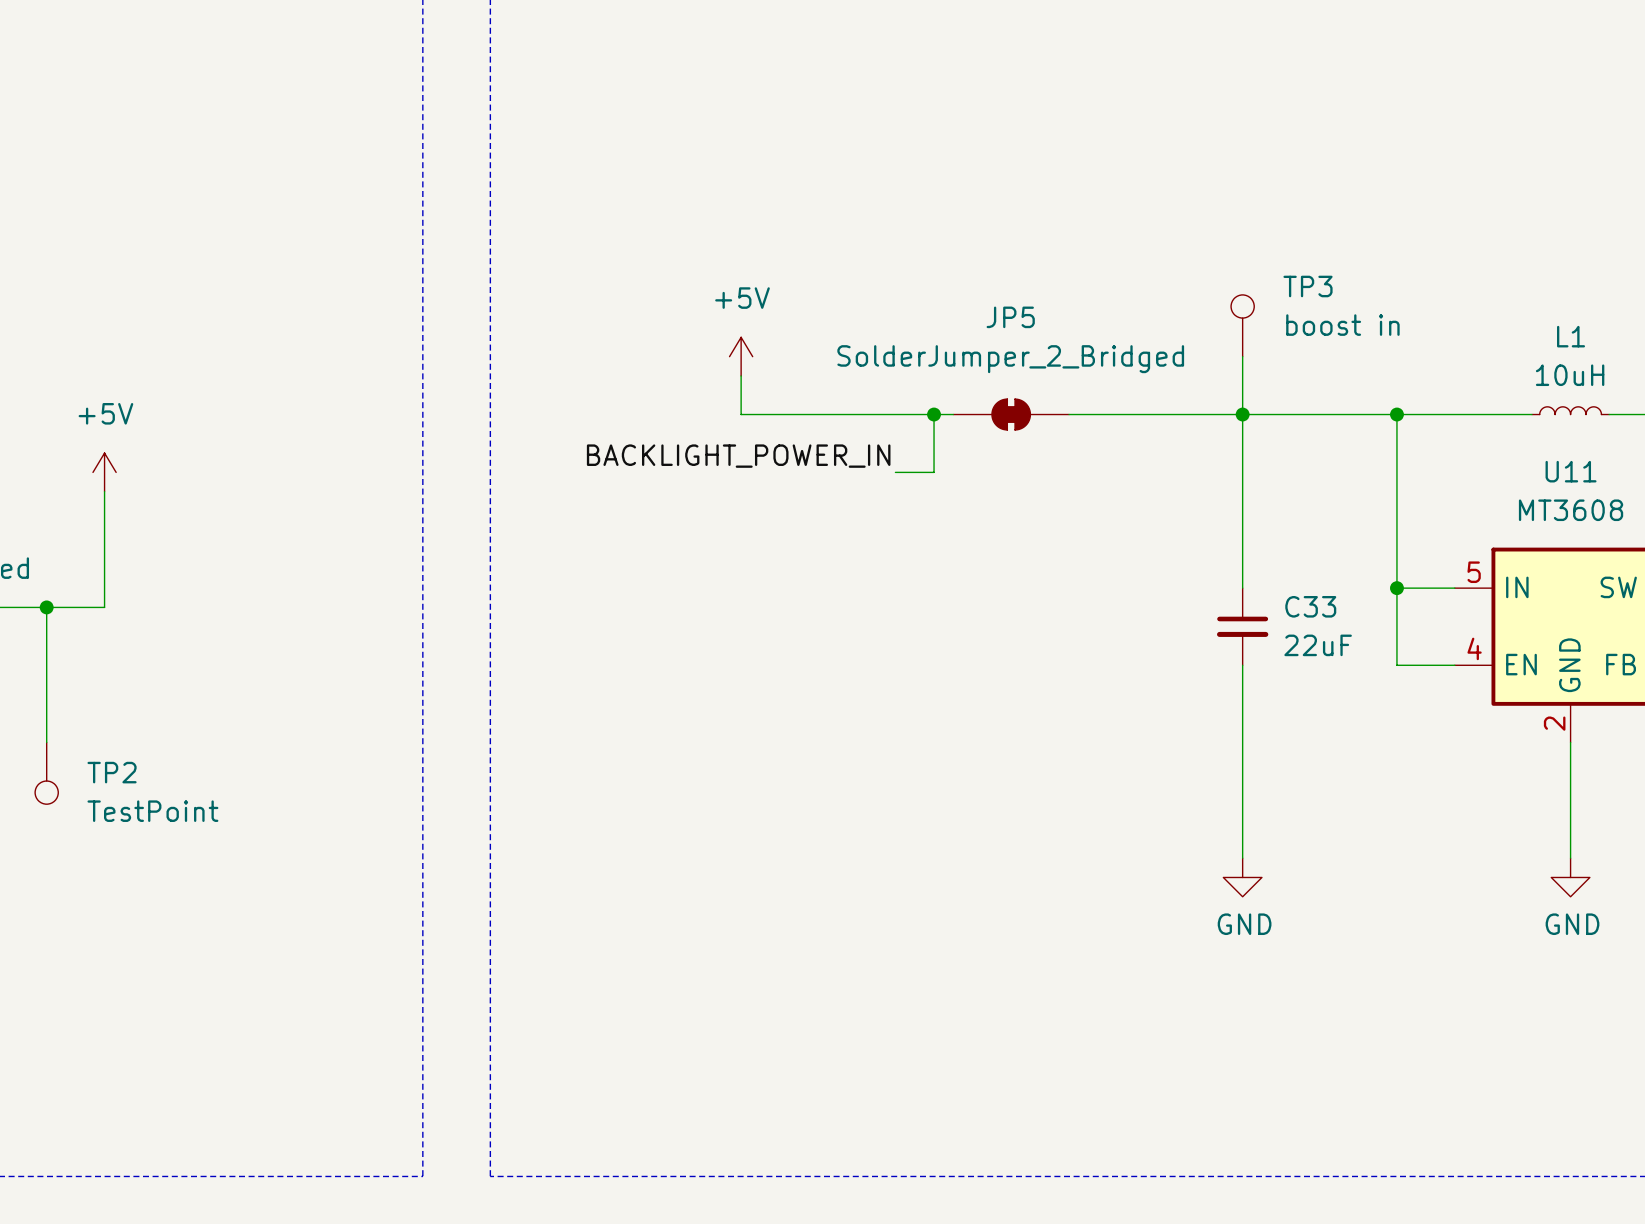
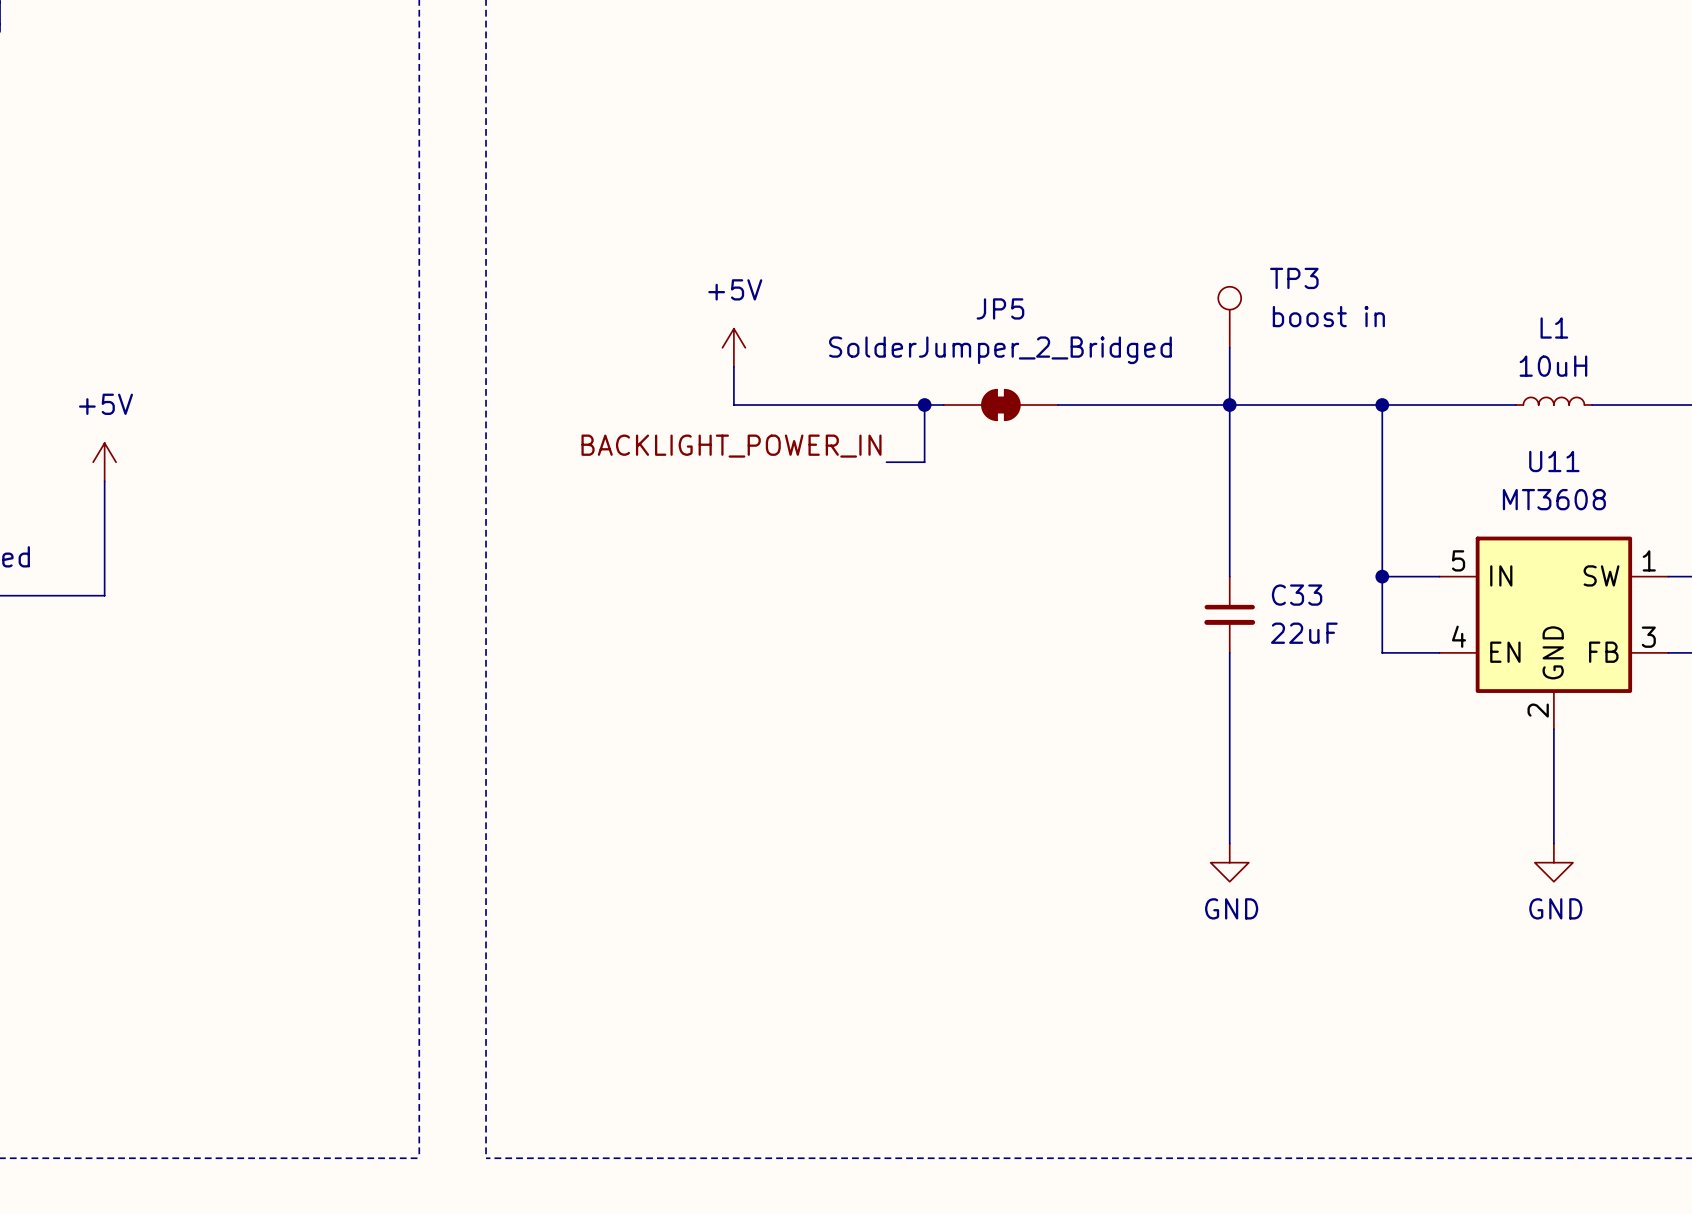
wire: (46, 607) (46, 742) -> none
junction: (46, 607) -> none
TP2: TestPoint (46, 773) -> none

